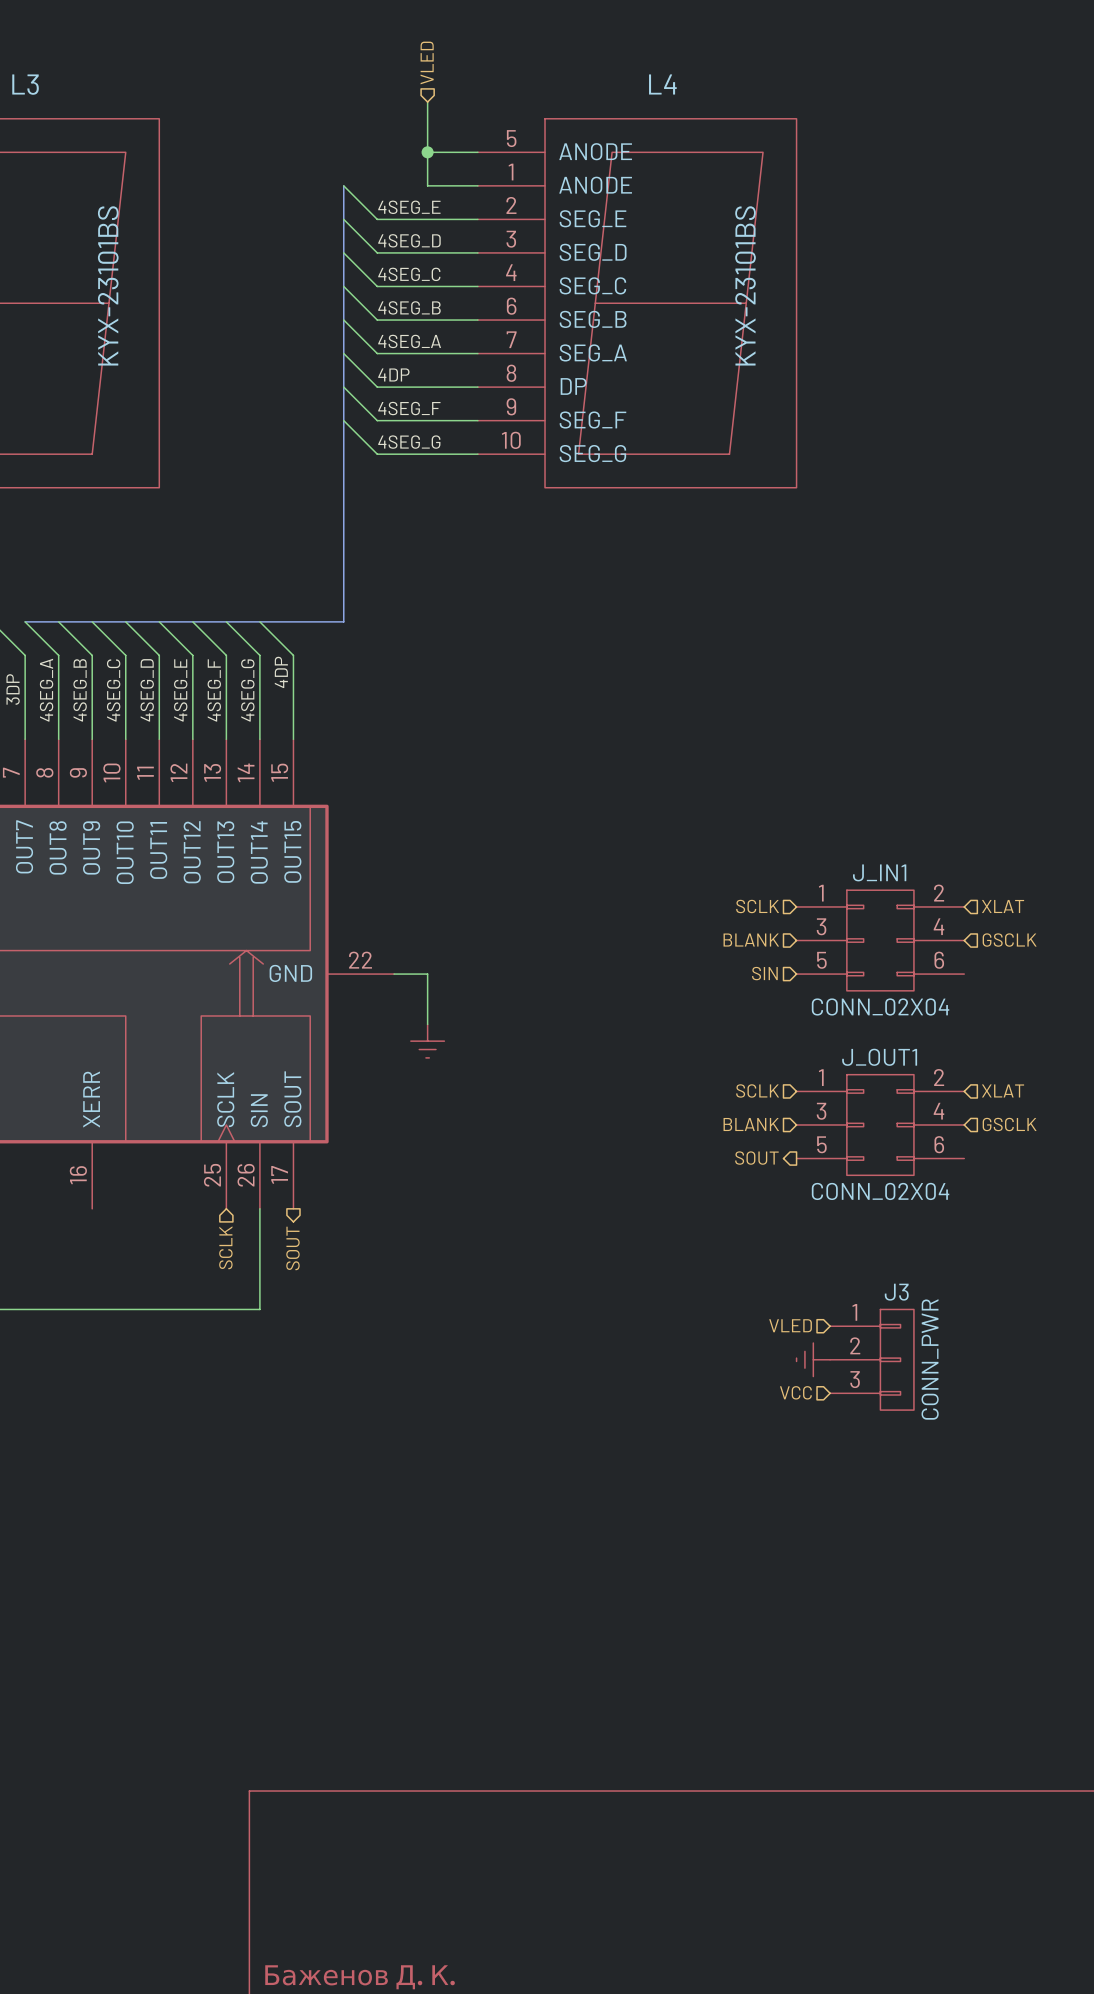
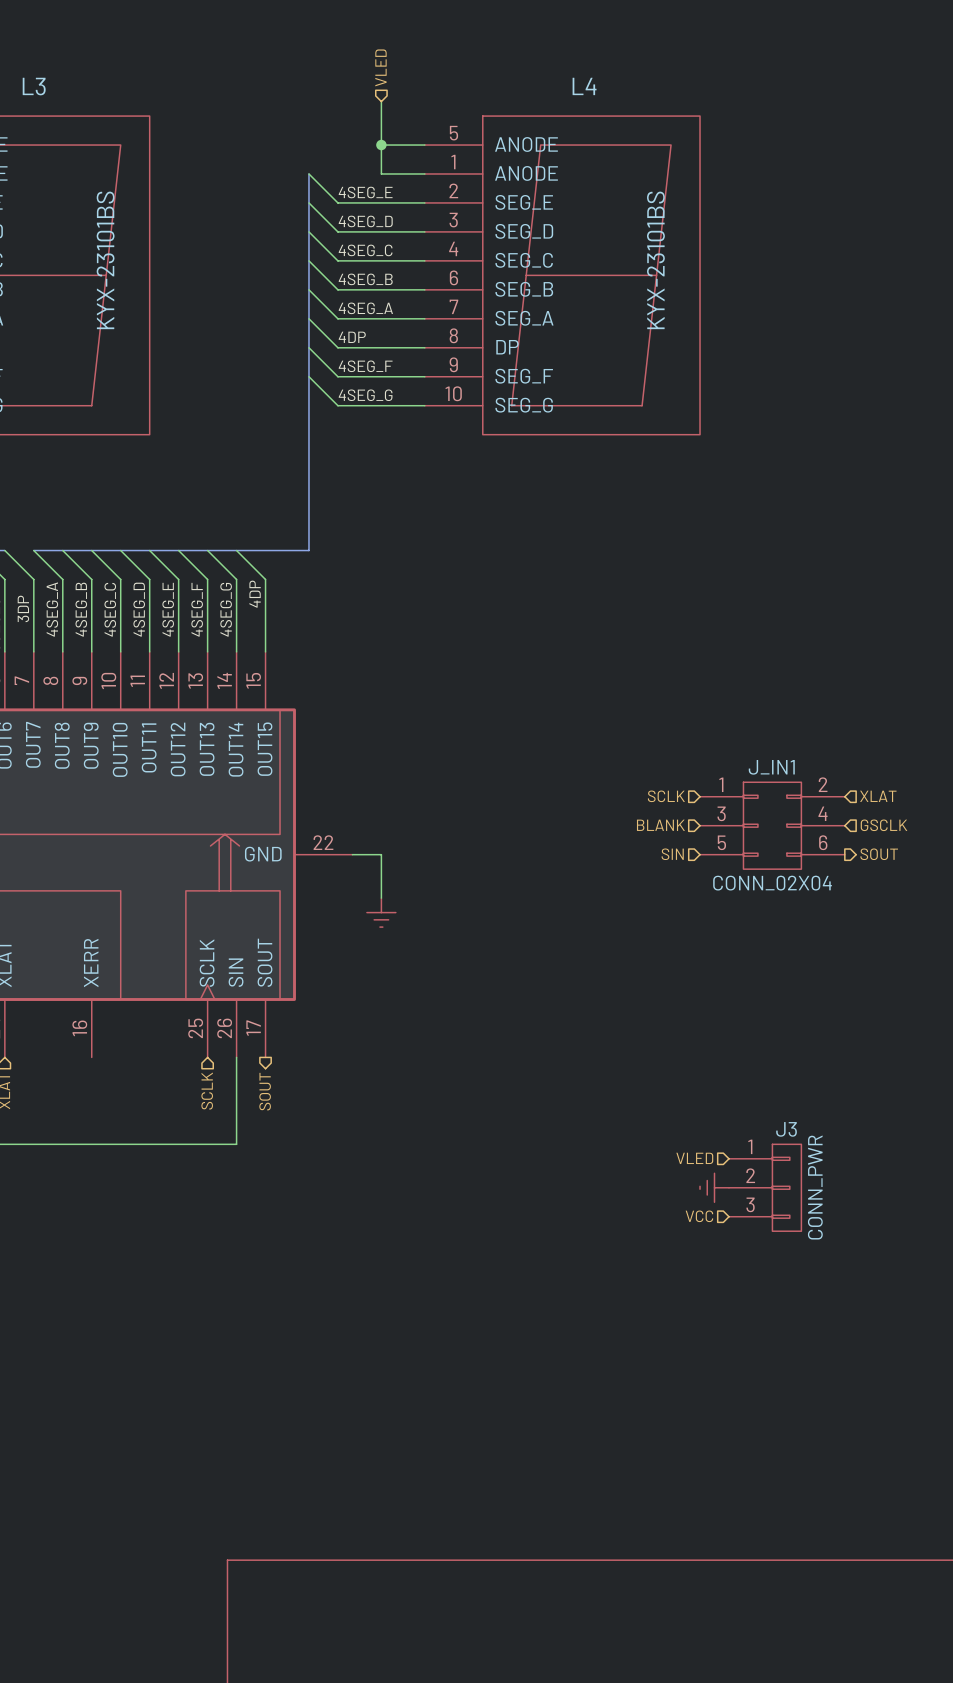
hierarchical label: SCLK (757, 1090) -> none
hierarchical label: XLAT (1003, 1090) -> none
hierarchical label: BLANK (751, 1124) -> none
J_OUT1: CONN_02X04 (880, 1124) -> none
hierarchical label: GSCLK (1009, 1124) -> none
hierarchical label rotation: 0° (756, 1158) -> 180° (879, 854)
hierarchical label position: SOUT (756, 1158) -> SOUT (879, 854)

